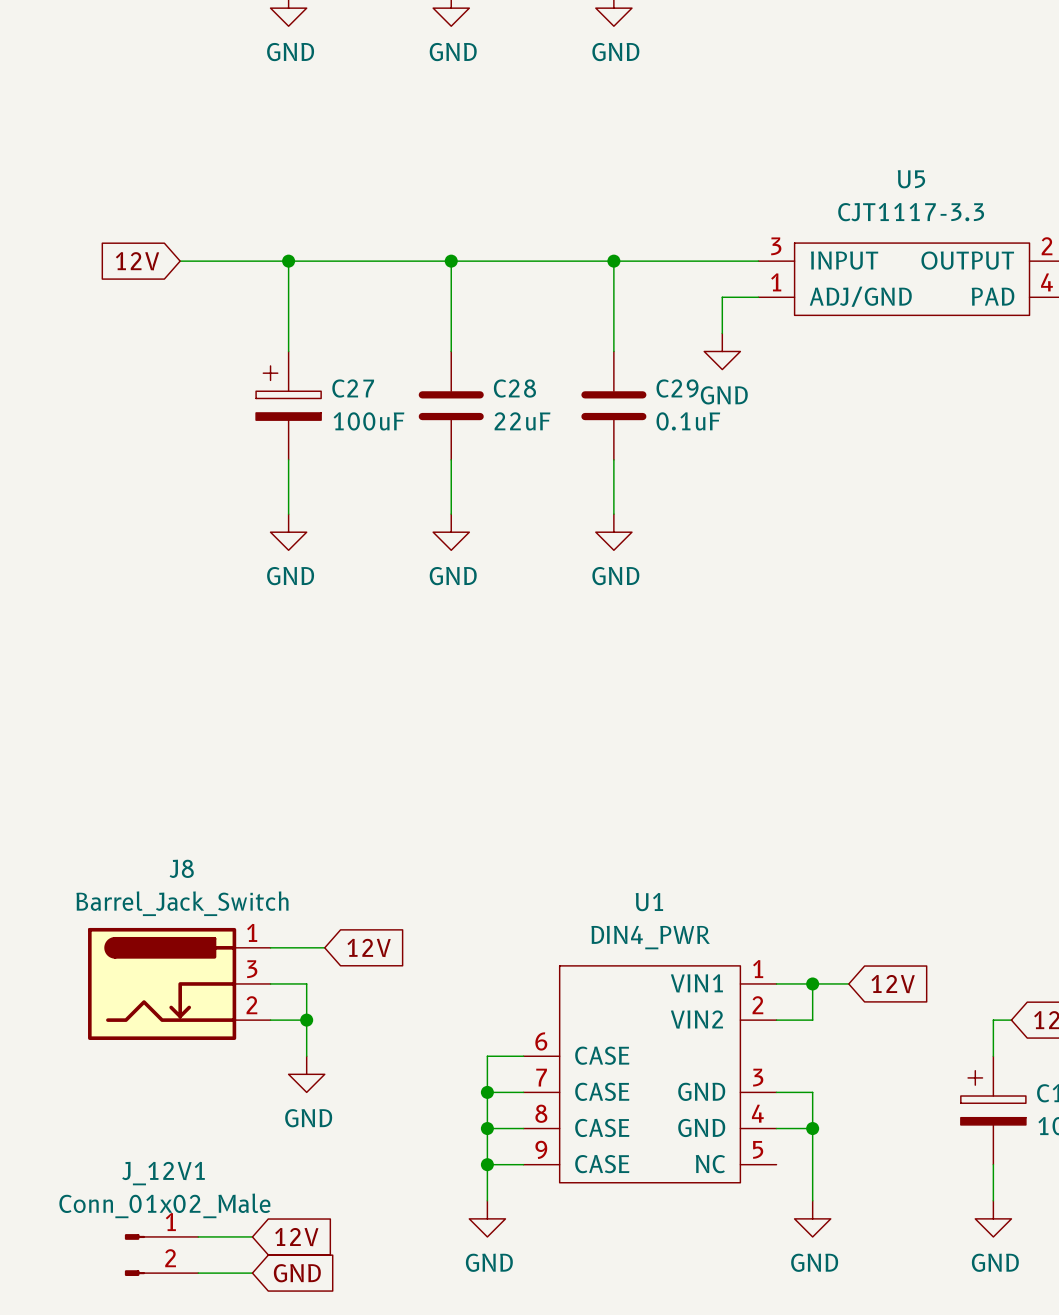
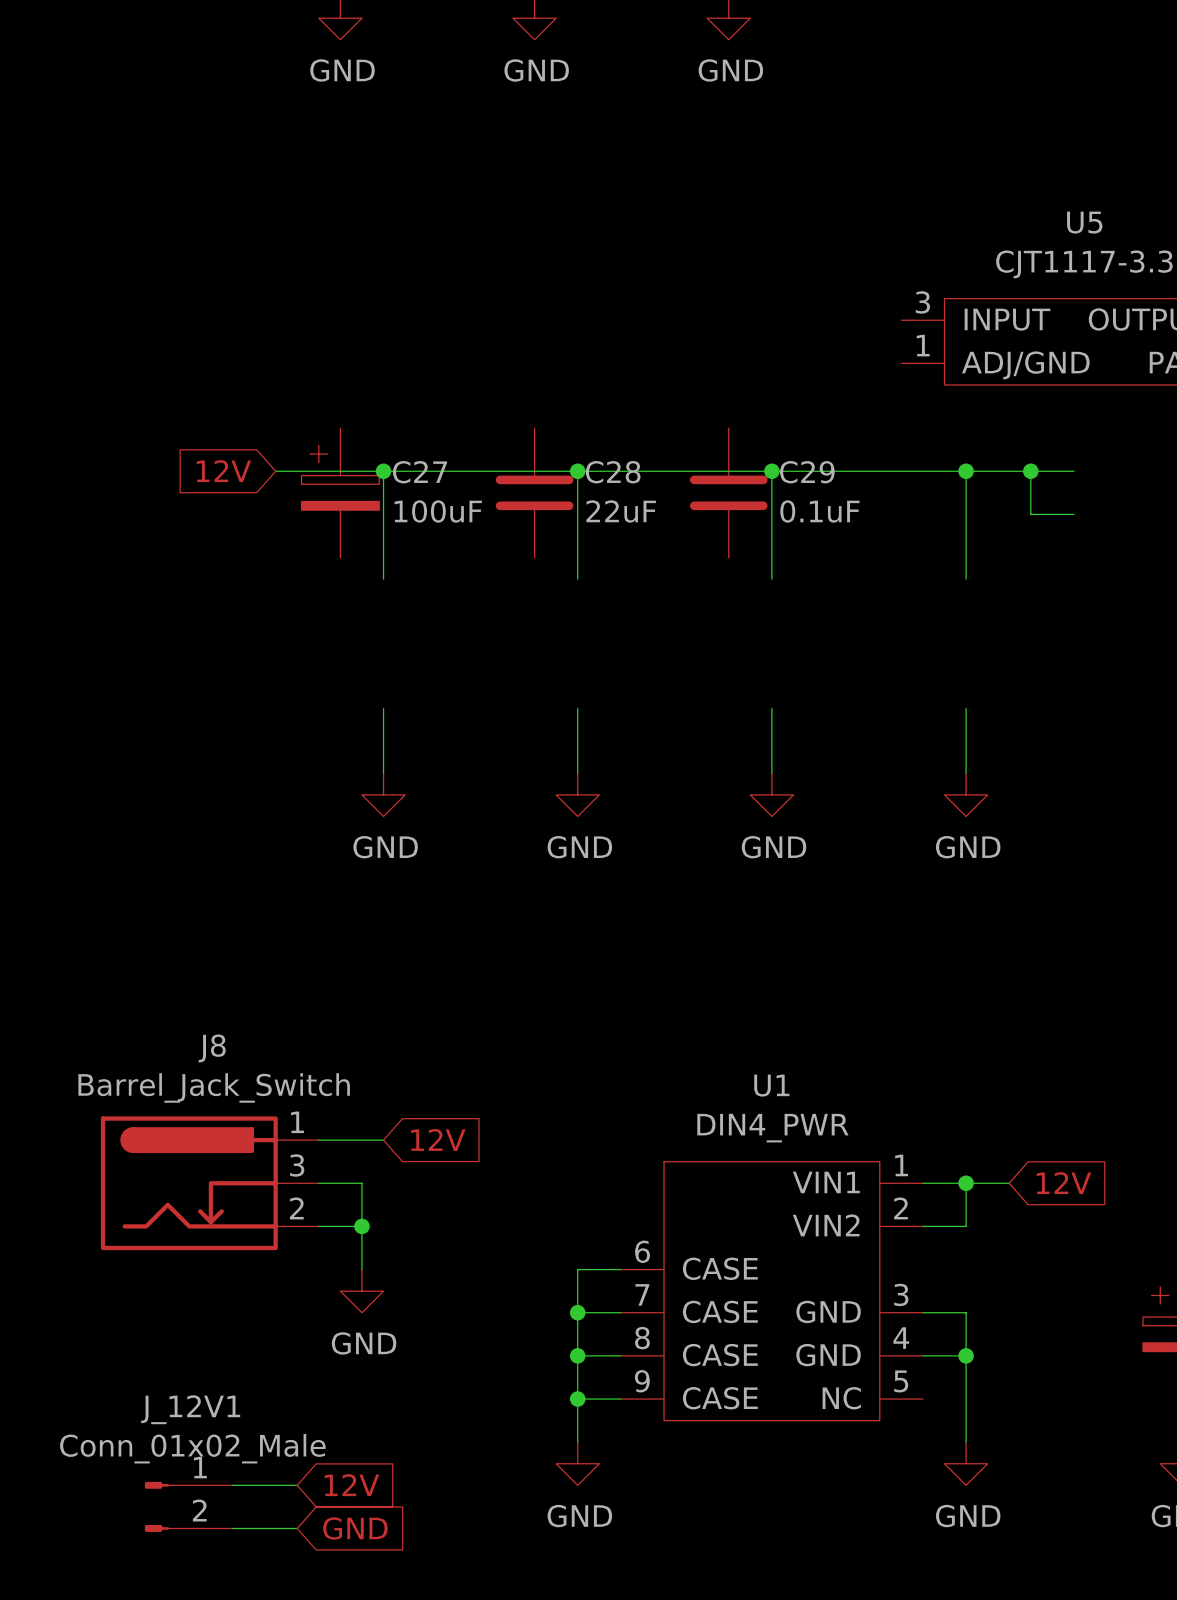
global label position: 12V (137, 261) -> 12V (223, 471)
wire: (180, 261) (758, 261) -> none
wire: (288, 261) (288, 351) -> (577, 471) (577, 579)
junction: (288, 261) -> none
wire: (451, 261) (451, 351) -> (771, 471) (771, 579)
junction: (451, 261) -> none
wire: (613, 261) (613, 351) -> (966, 471) (966, 579)
junction: (613, 261) -> none
wire: (758, 297) (722, 297) (722, 333) -> none
power symbol: GND (722, 351) -> none
wire: none -> (275, 471) (1073, 471)
wire: none -> (383, 471) (383, 579)
junction: none -> (383, 471)
junction: none -> (577, 471)
junction: none -> (771, 471)
junction: none -> (966, 471)
wire: none -> (1030, 471) (1030, 514) (1073, 514)
junction: none -> (1030, 471)
wire: (288, 459) (288, 514) -> (577, 708) (577, 773)
wire: (451, 459) (451, 514) -> (771, 708) (771, 773)
wire: (613, 459) (613, 514) -> (966, 708) (966, 773)
power symbol: GND (288, 532) -> none
power symbol: GND (451, 532) -> none
power symbol: GND (613, 532) -> none
wire: none -> (383, 708) (383, 773)
power symbol: none -> GND (383, 794)
power symbol: none -> GND (577, 794)
power symbol: none -> GND (771, 794)
power symbol: none -> GND (966, 794)

